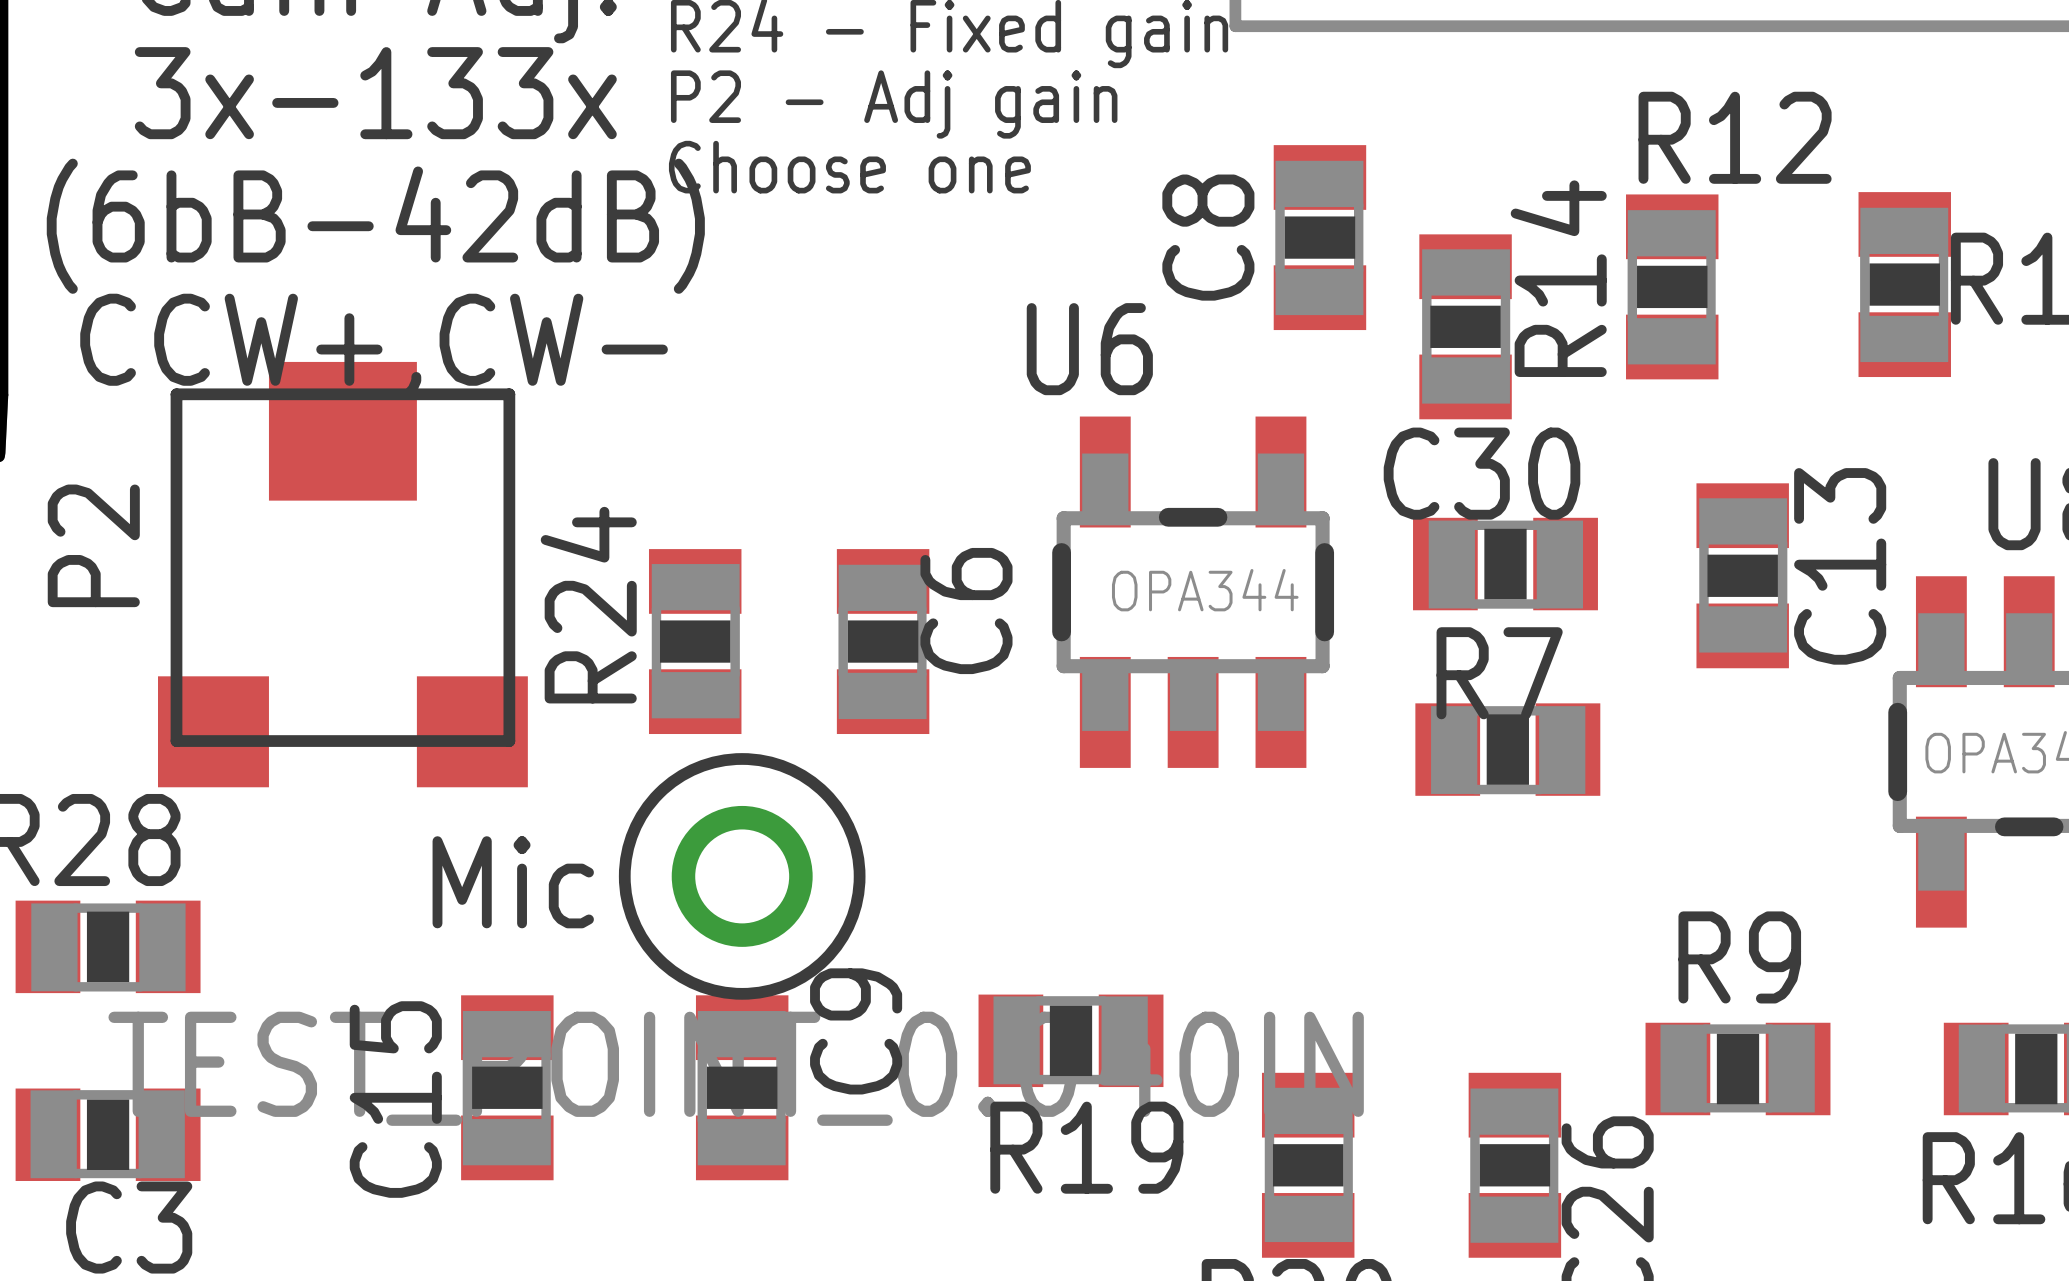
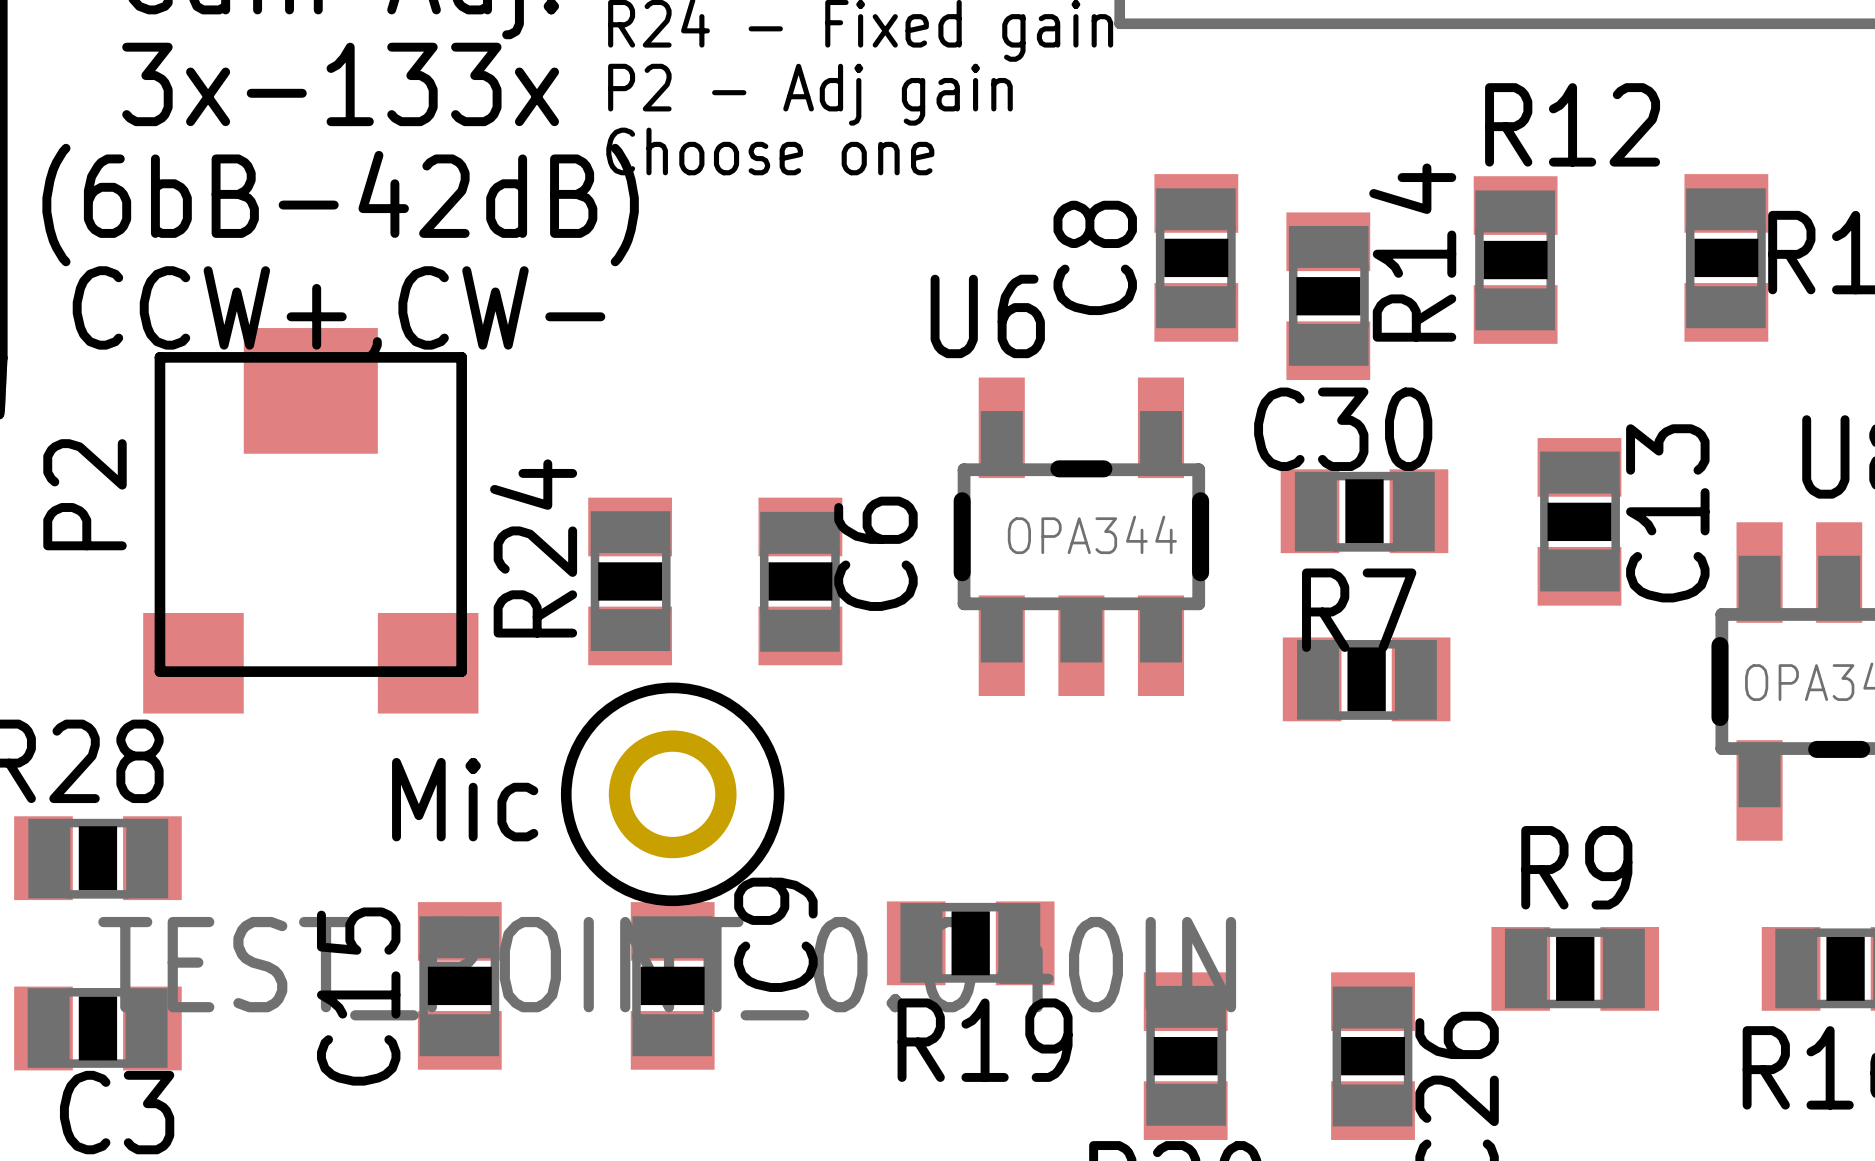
C8 position: (1319, 237) -> (1196, 257)

